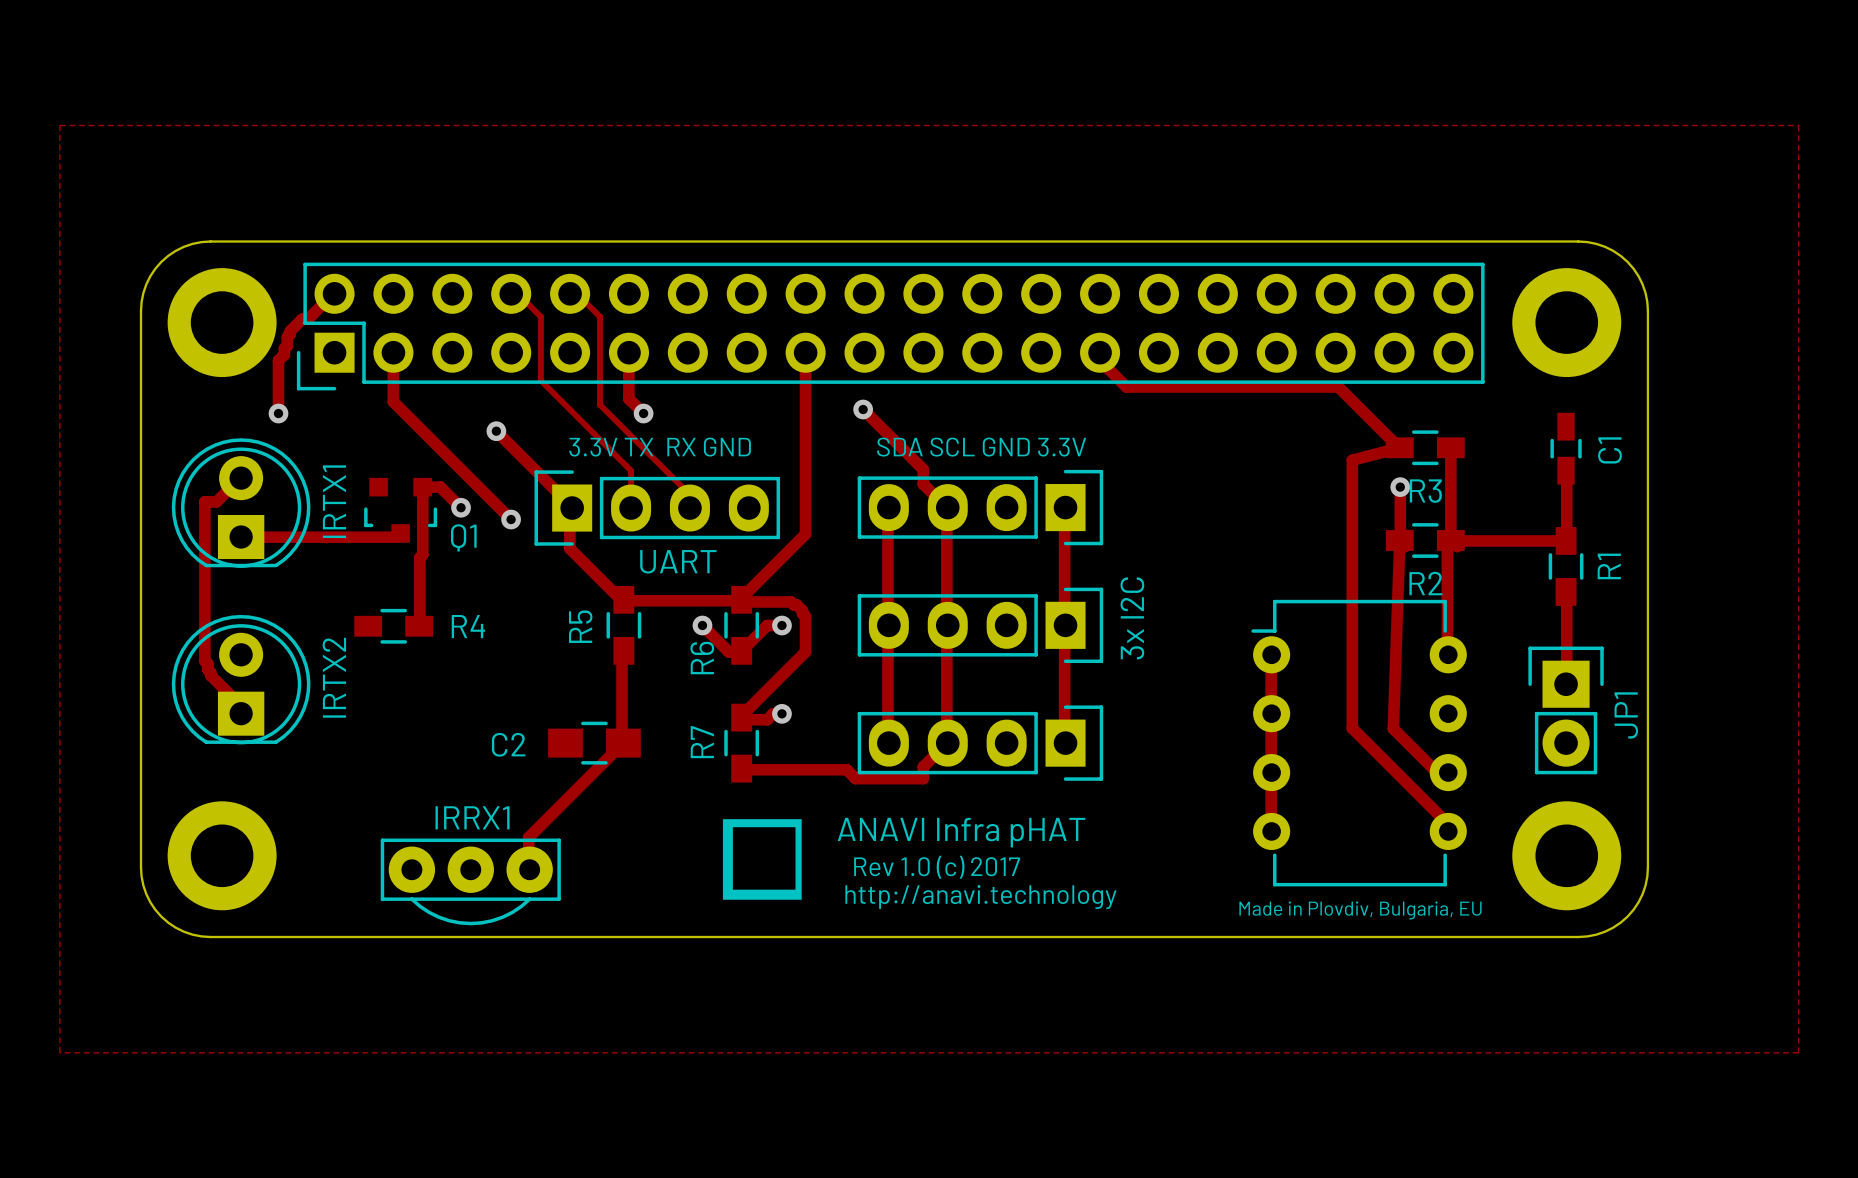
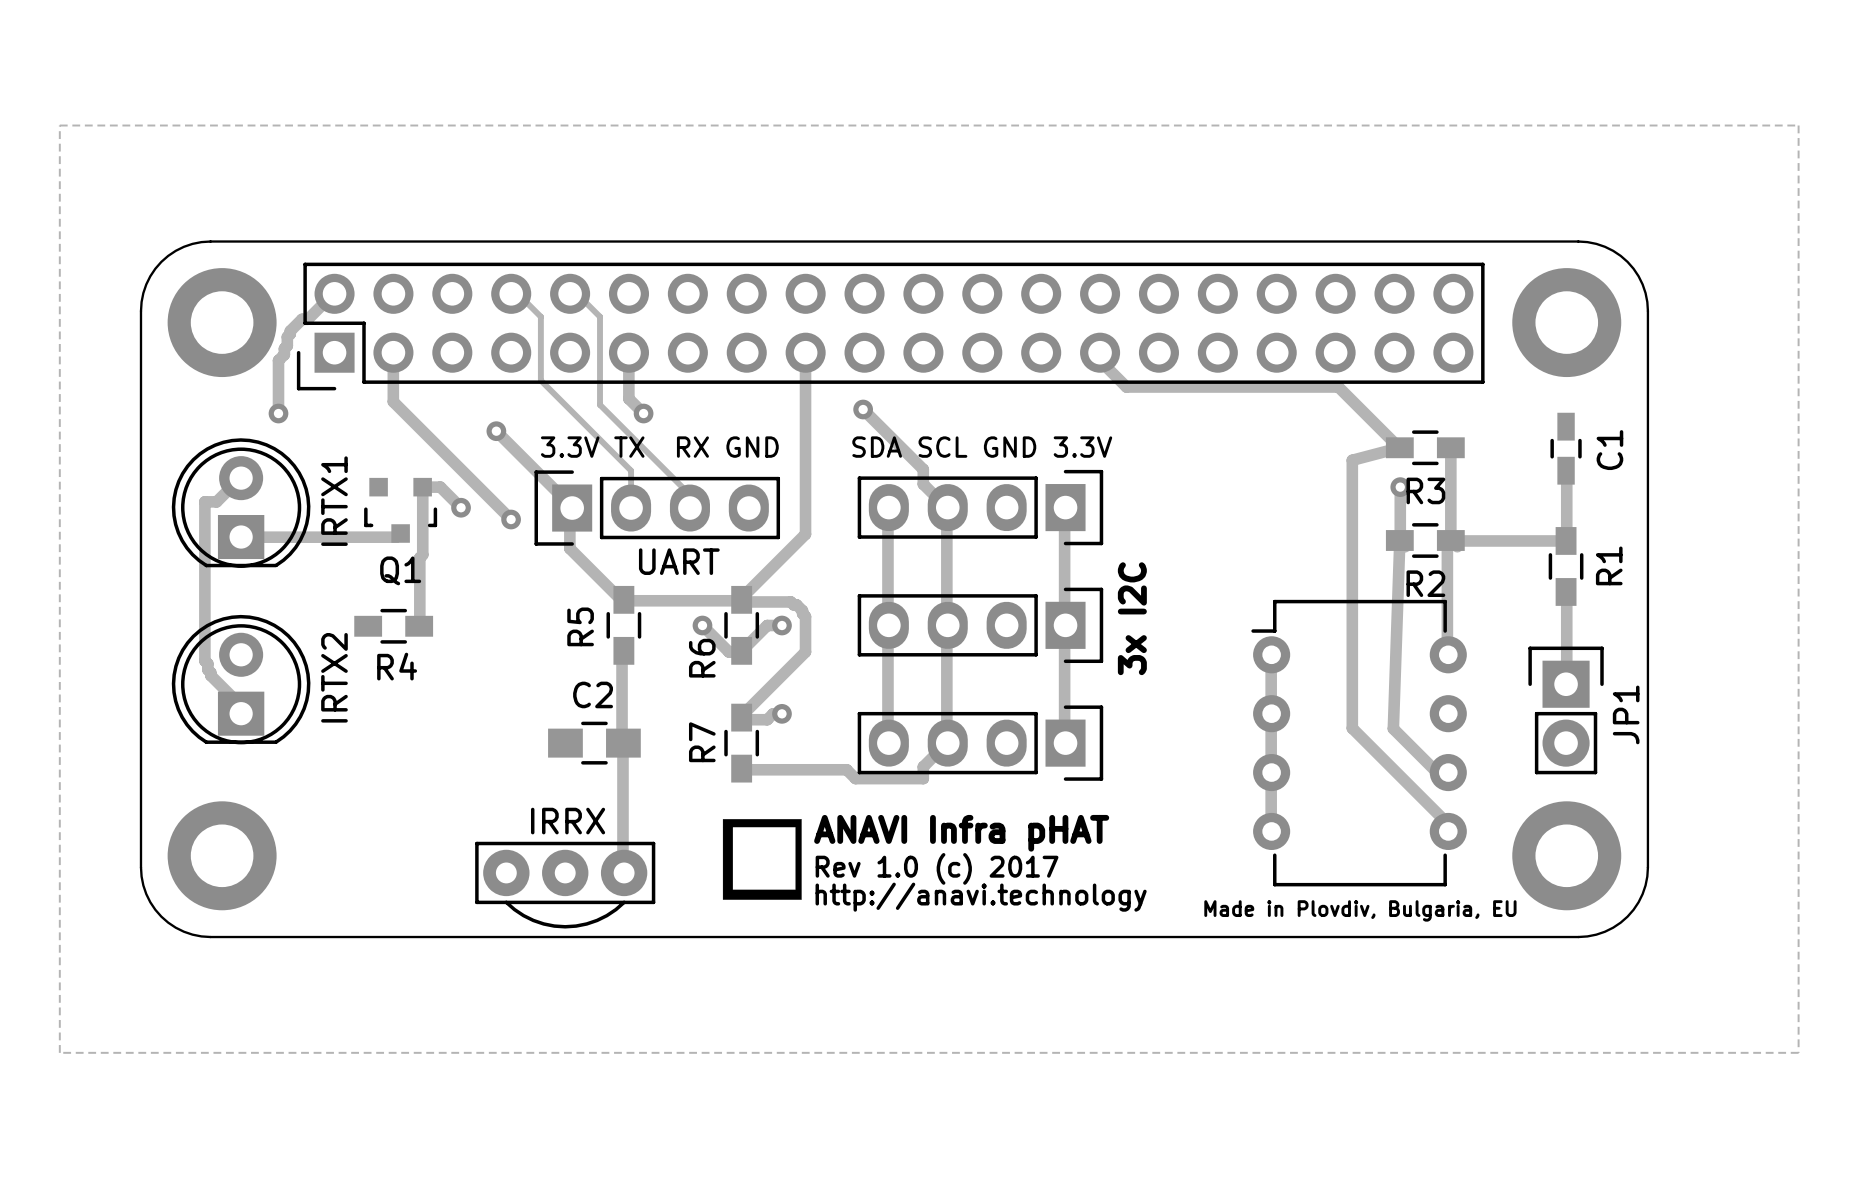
Q1 name position: Q1 (463, 537) -> Q1 (400, 570)
R4 name position: R4 (468, 626) -> R4 (397, 666)
track: (622, 743) (528, 837) (529, 869) -> (622, 743) (623, 873)
C2 name position: C2 (508, 744) -> C2 (593, 694)
IRRX1: (470, 881) -> none
IRRX: none -> (565, 885)

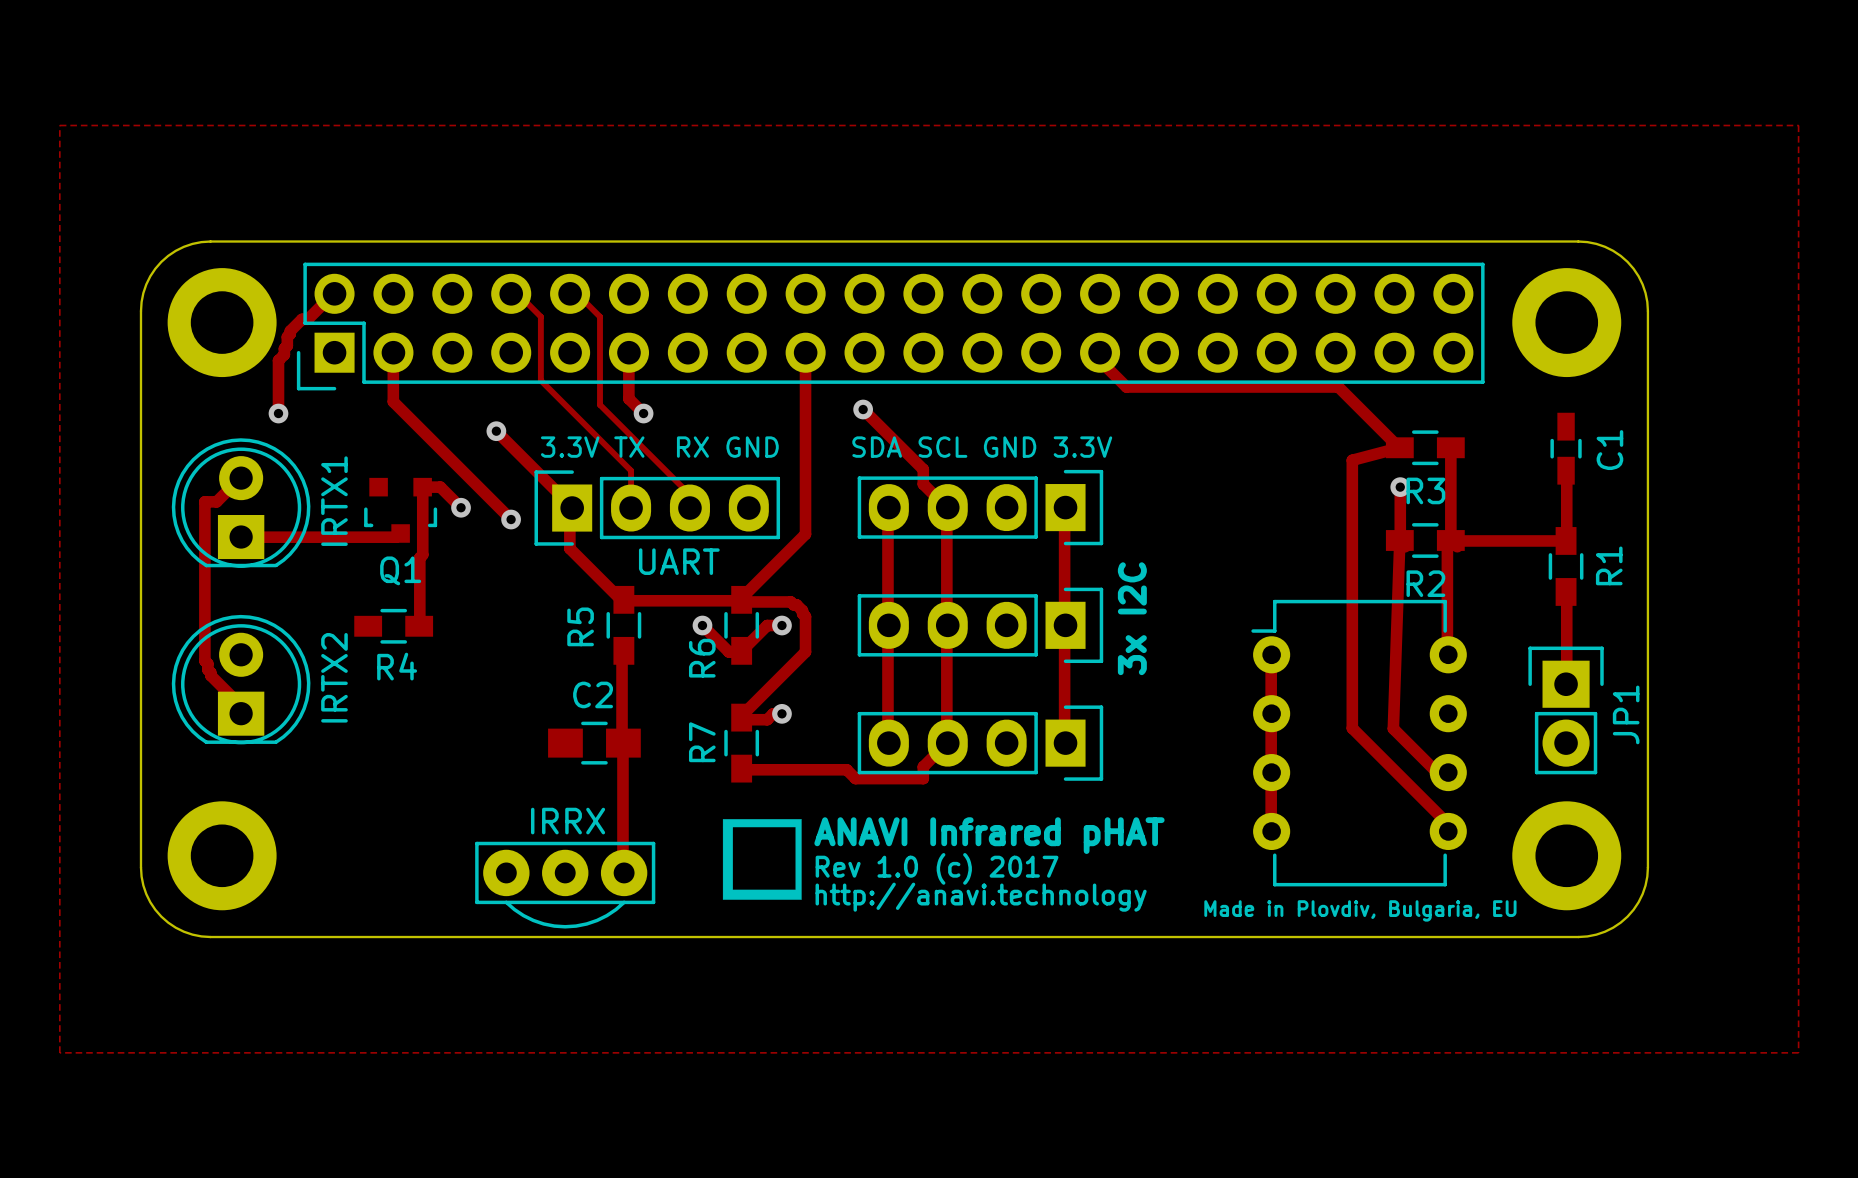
text: ANAVI Infra pHAT (961, 833) -> ANAVI Infrared pHAT (989, 835)

